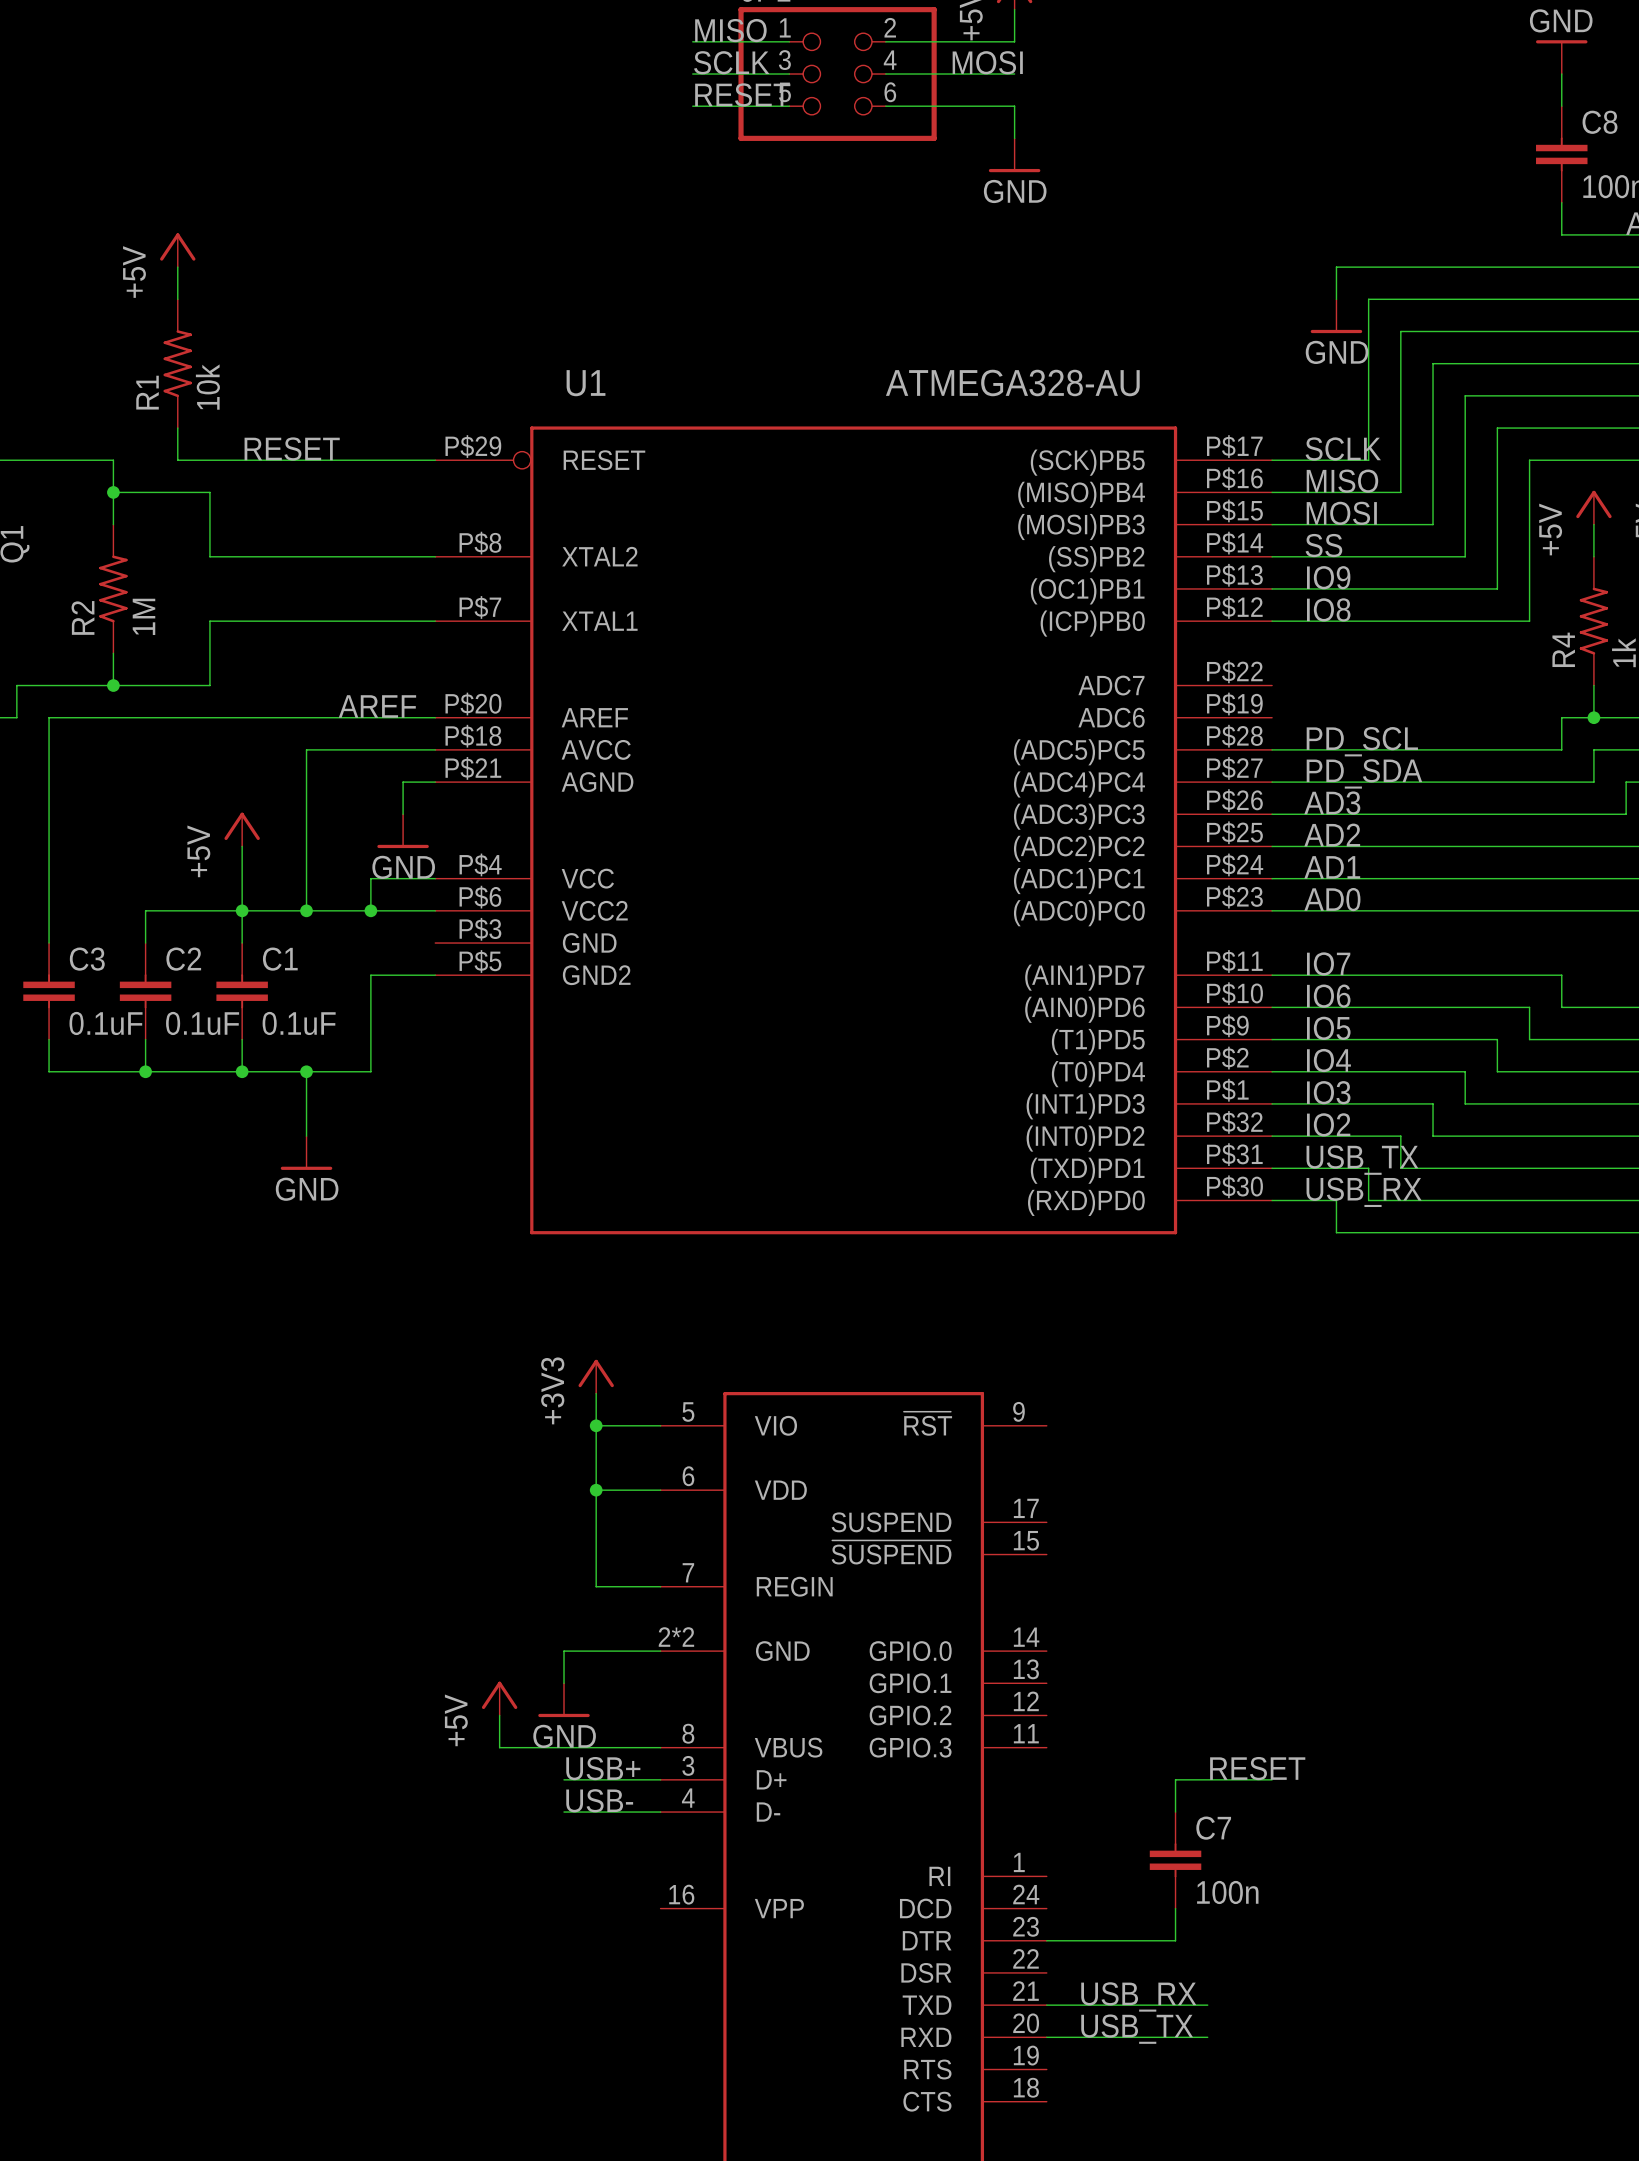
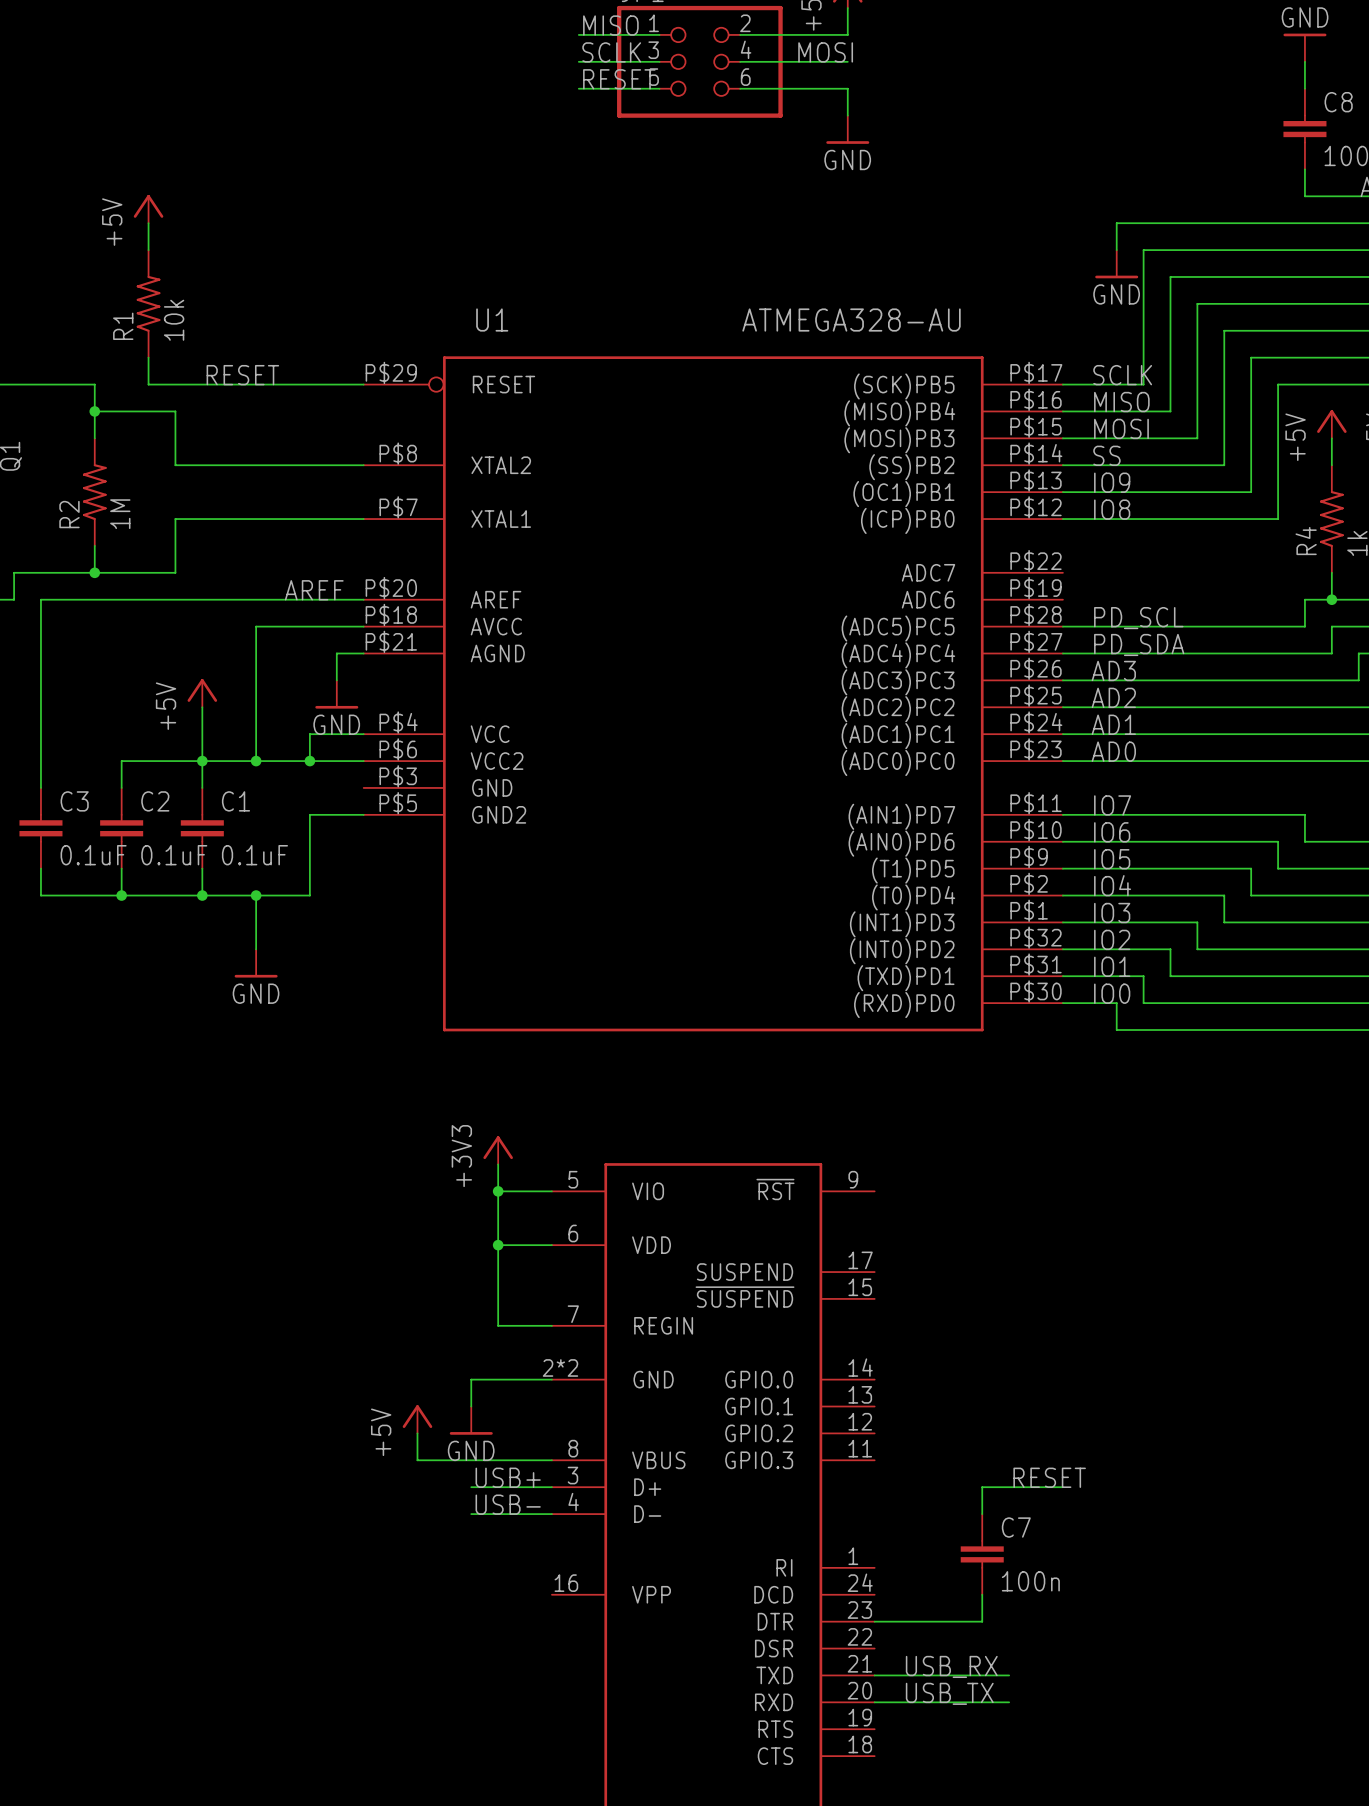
label: USB_TX (1362, 1160) -> IO1 (1112, 966)
label: USB_RX (1364, 1192) -> IO0 (1112, 993)

